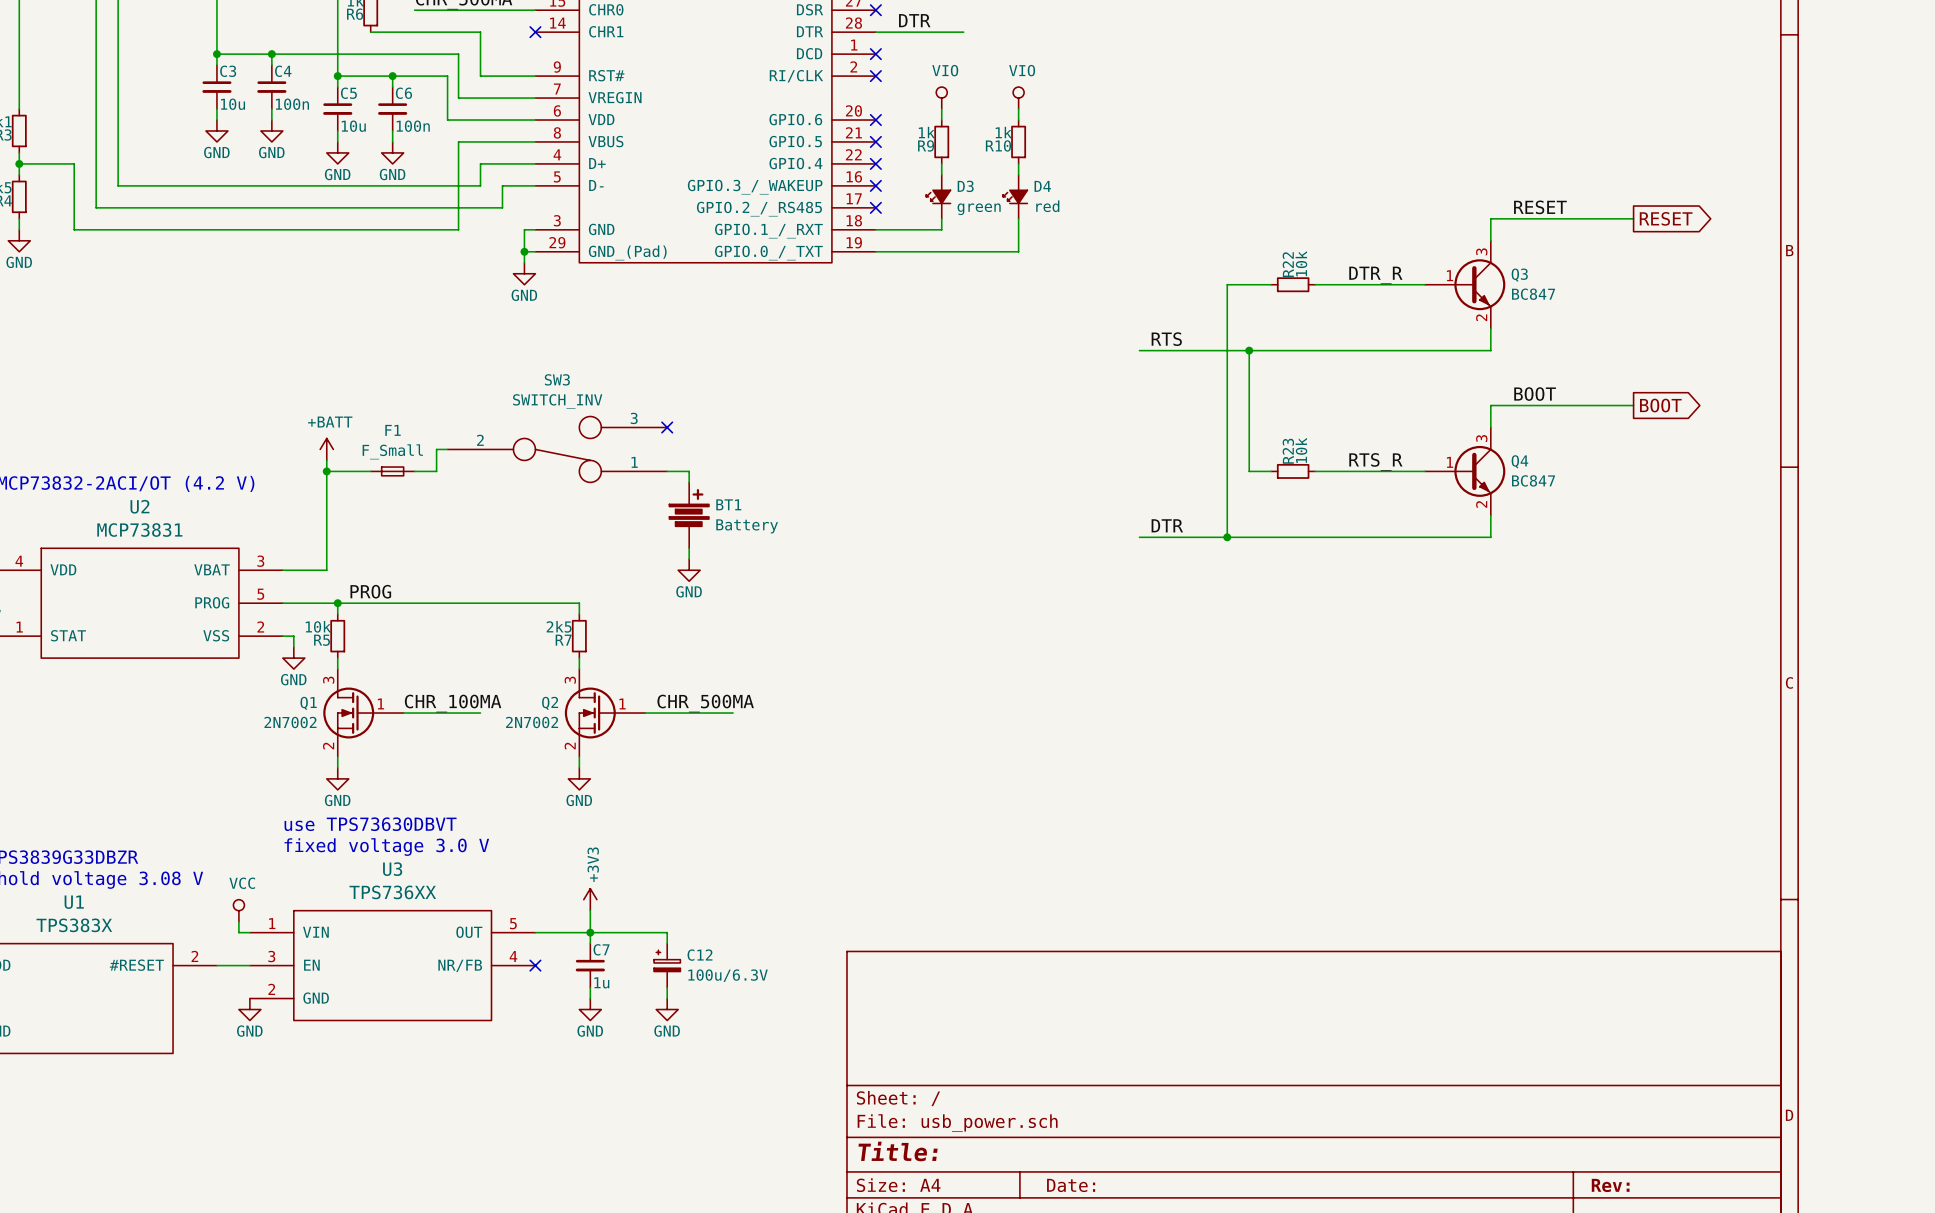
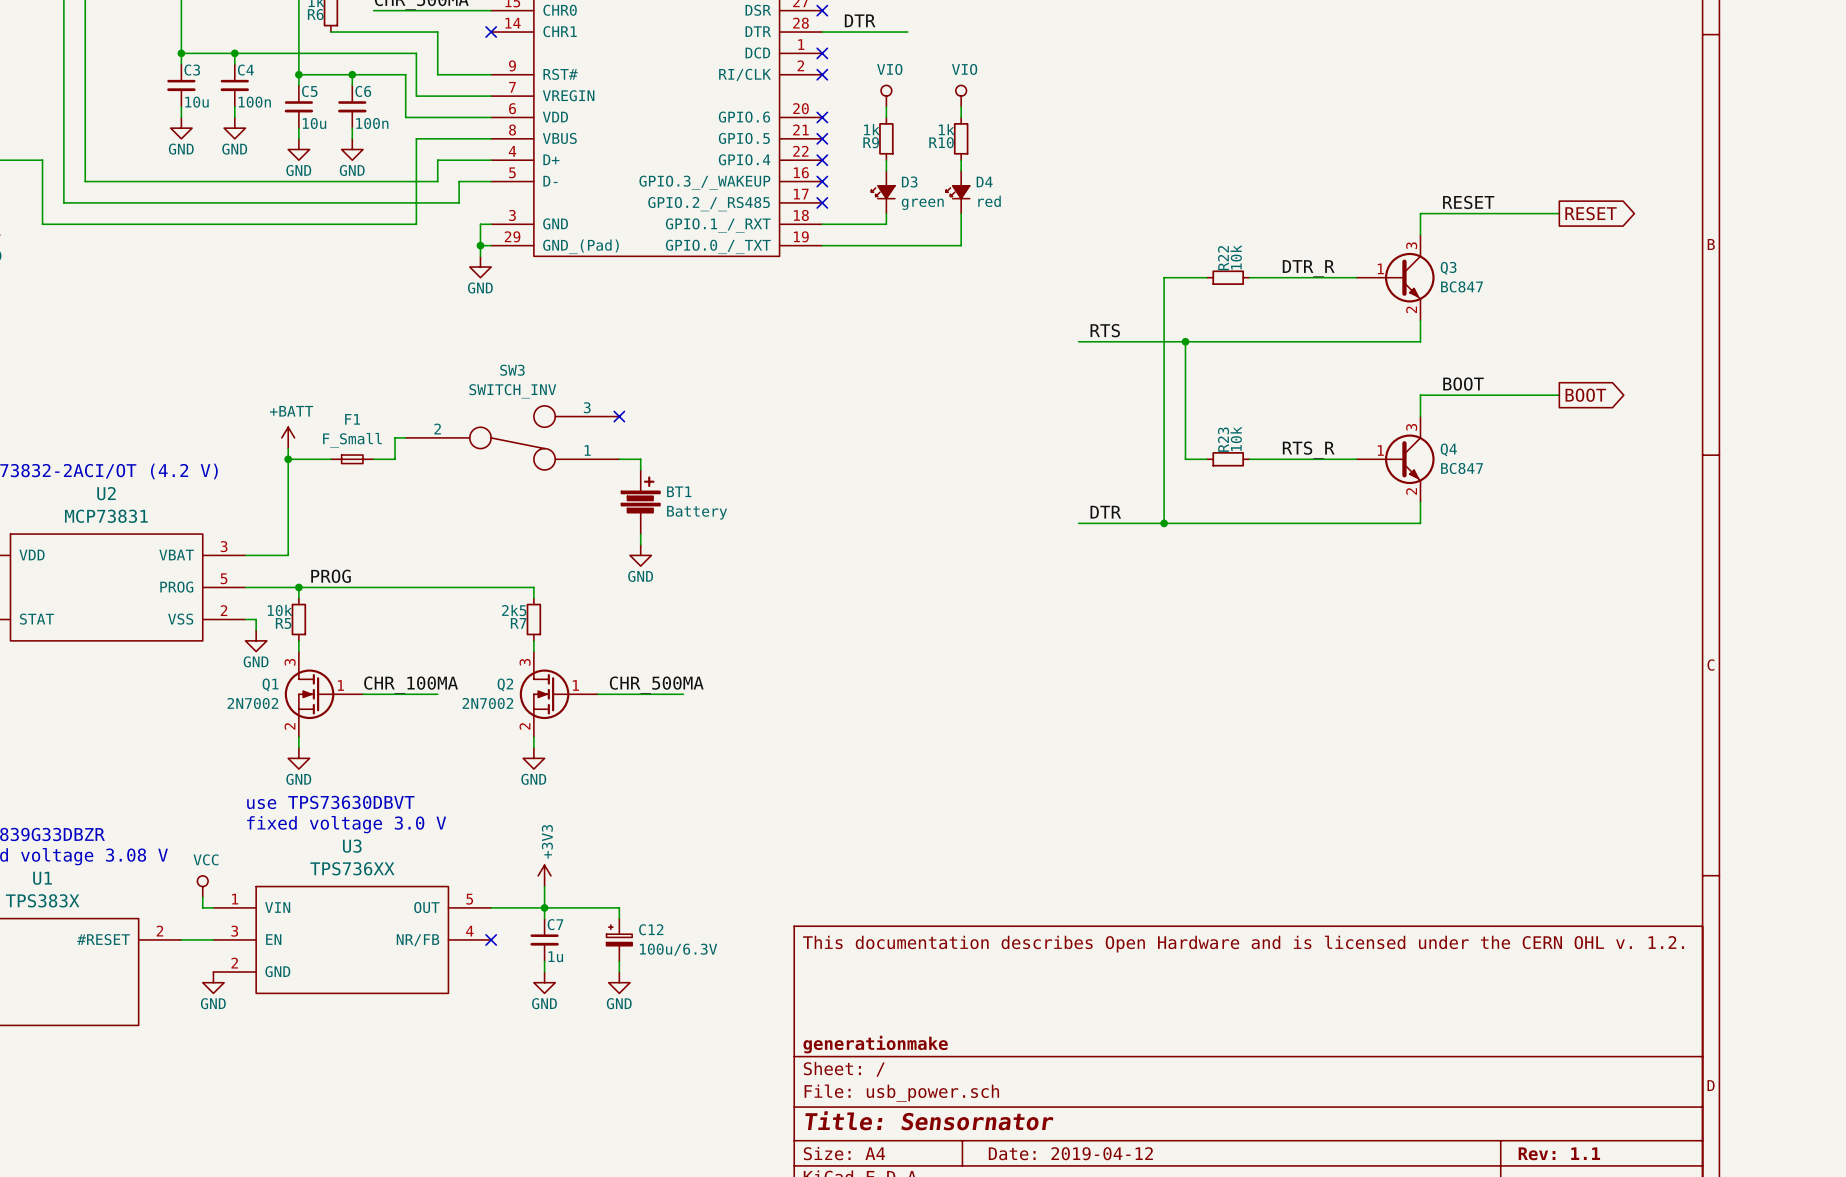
title block: none -> This documentation describes Open Hardware and is licensed under the CERN OHL v. 1.2. (1243, 944)
title block: none -> generationmake (875, 1044)
title block: Title: (898, 1151) -> Title: Sensornator (929, 1120)
title block: Date: (1071, 1185) -> Date: 2019-04-12 (1070, 1153)
title block: Rev: (1610, 1185) -> Rev: 1.1 (1559, 1153)

